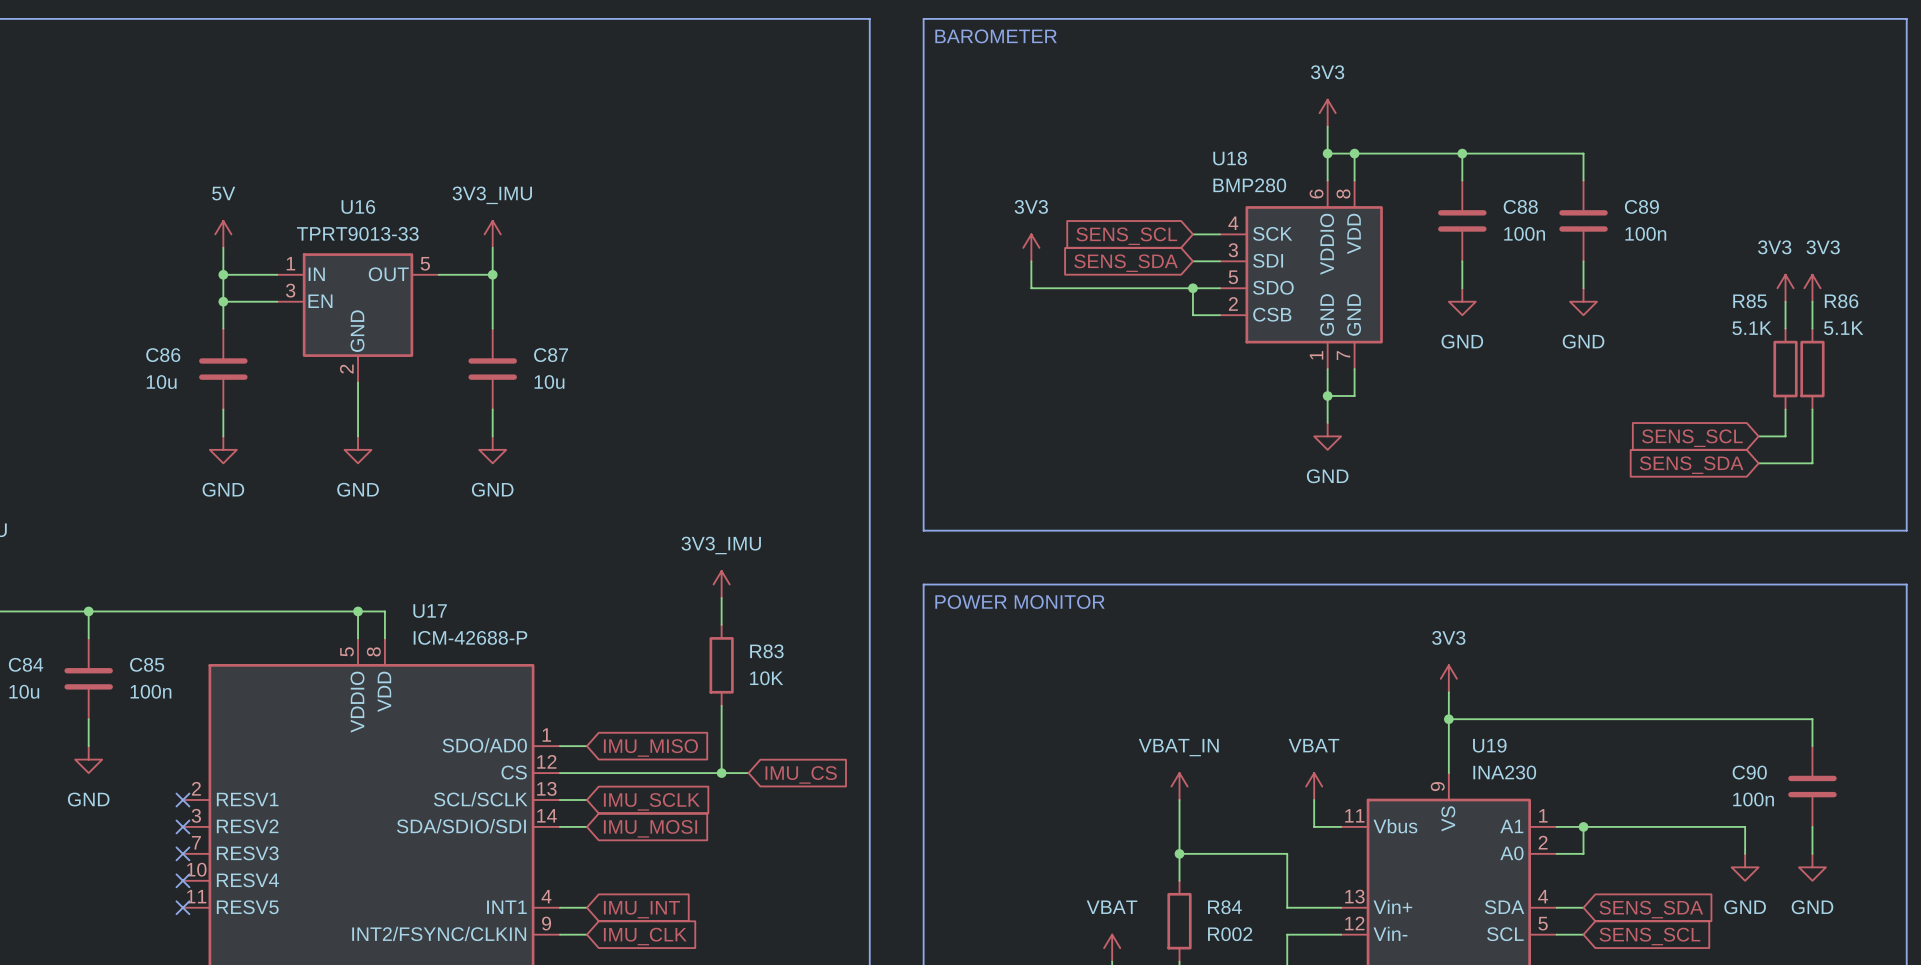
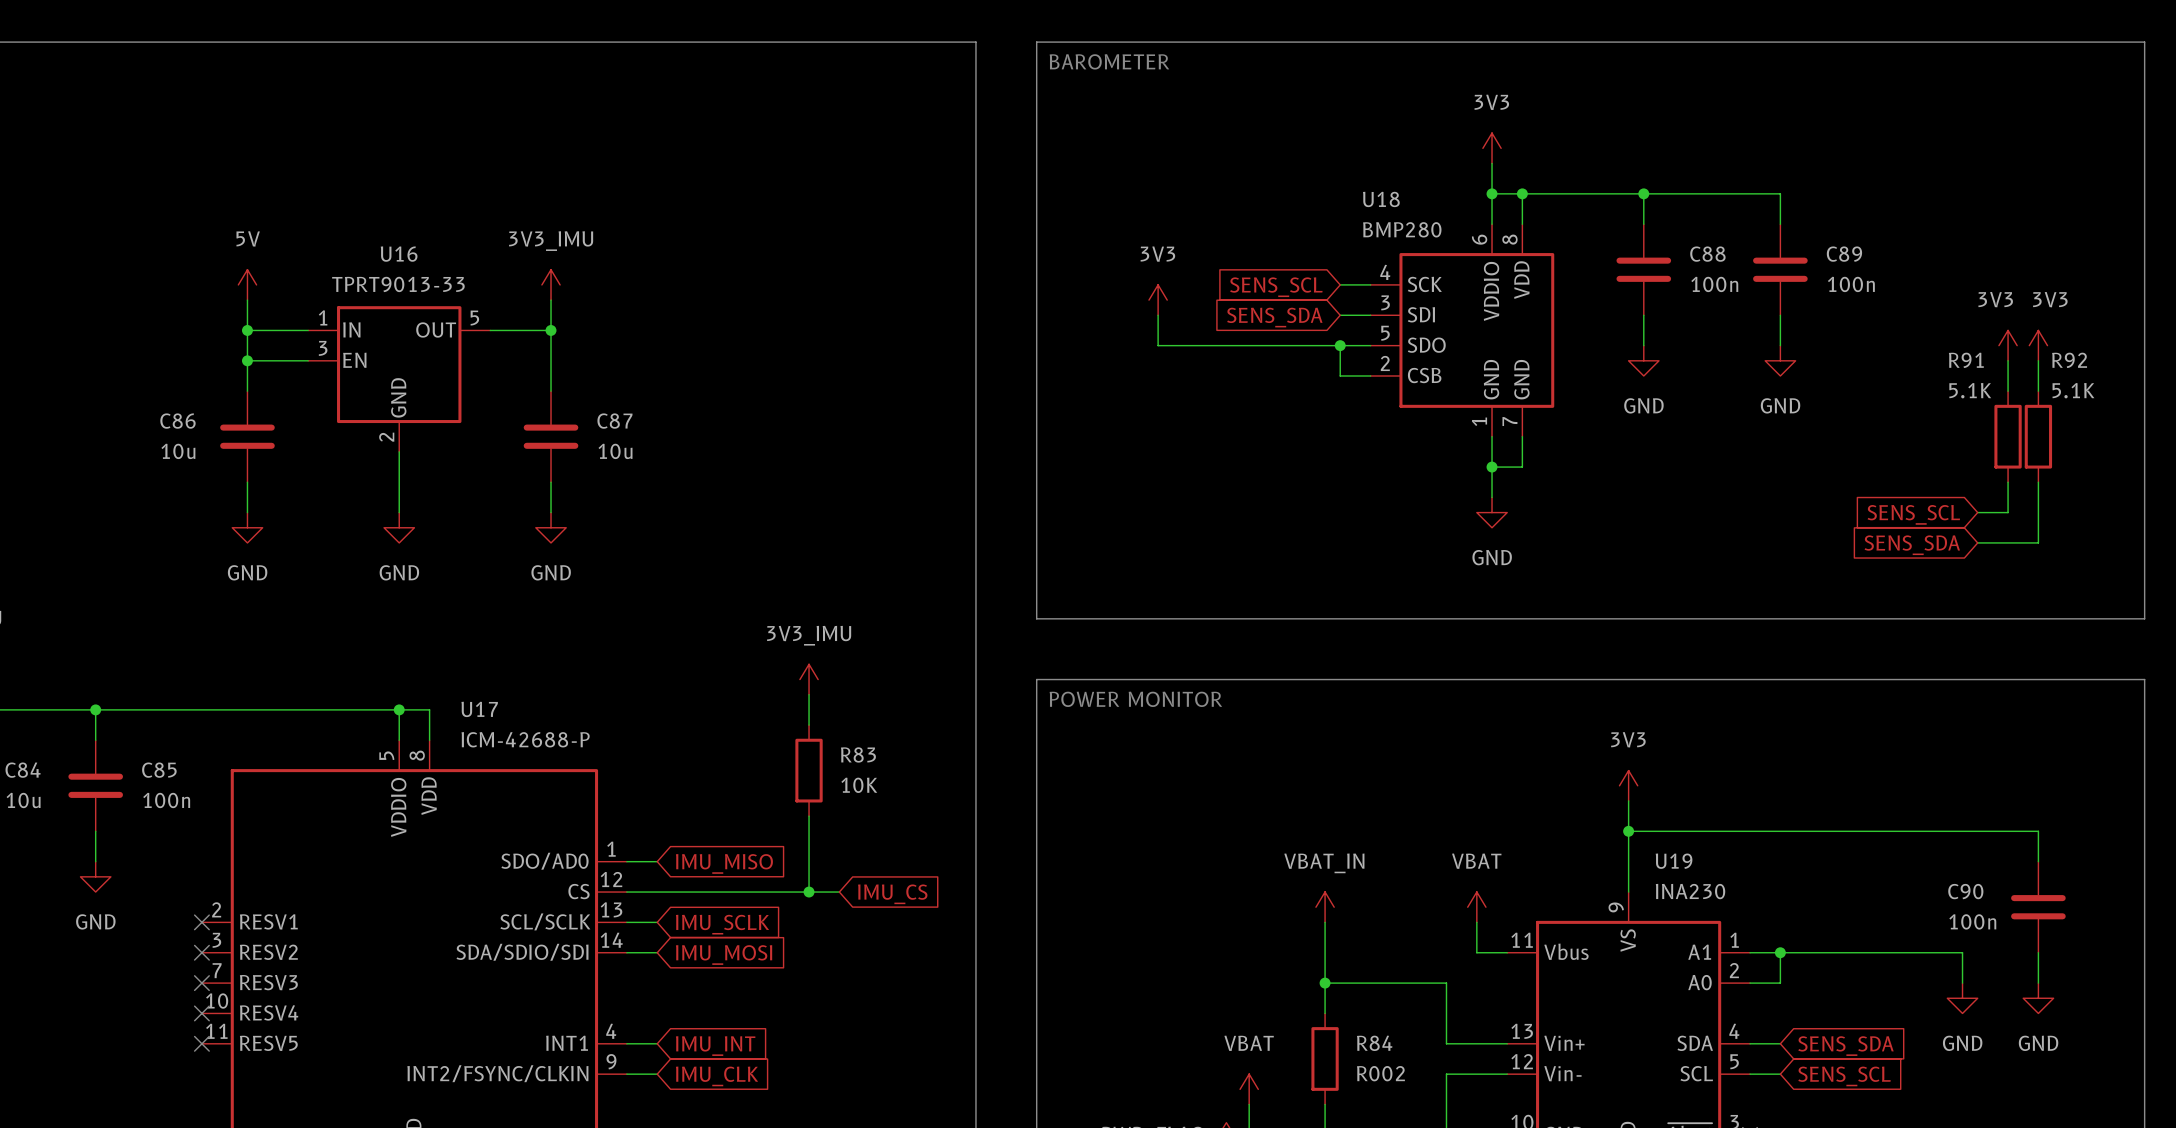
R85 name: R85 (1750, 301) -> R91 (1966, 360)
R86 name: R86 (1841, 301) -> R92 (2069, 360)

